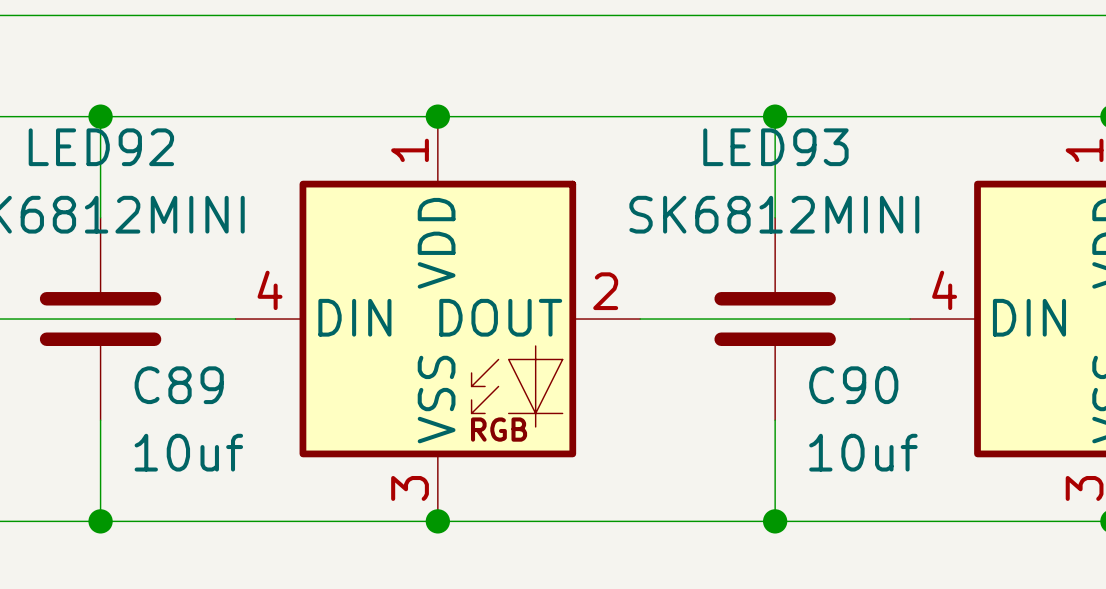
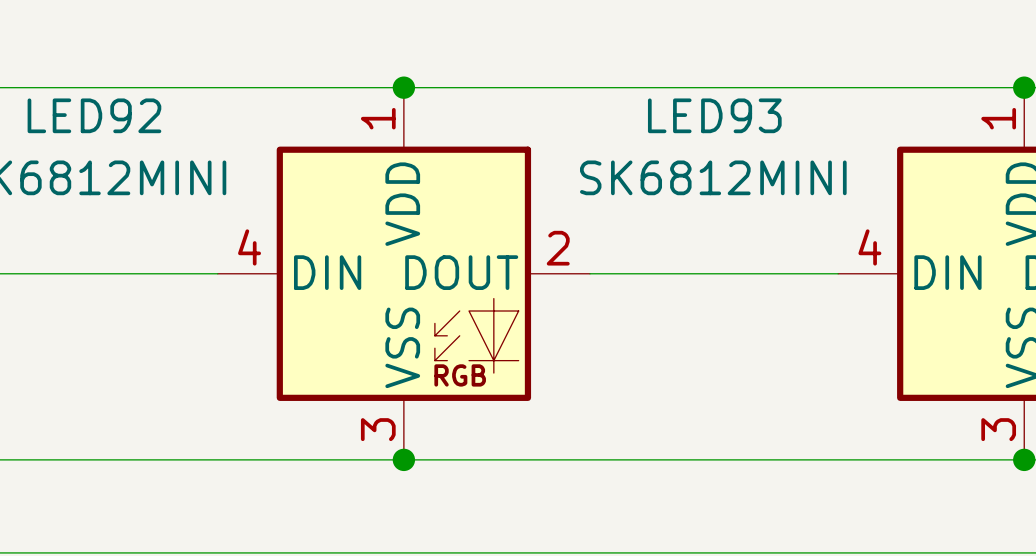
wire: (100, 116) (100, 217) -> none
junction: (100, 116) -> none
wire: (775, 116) (775, 217) -> none
junction: (775, 116) -> none
C89: 10uf (100, 319) -> none
C90: 10uf (775, 319) -> none
wire: (100, 420) (100, 521) -> none
wire: (775, 420) (775, 521) -> none
junction: (100, 521) -> none
junction: (775, 521) -> none

